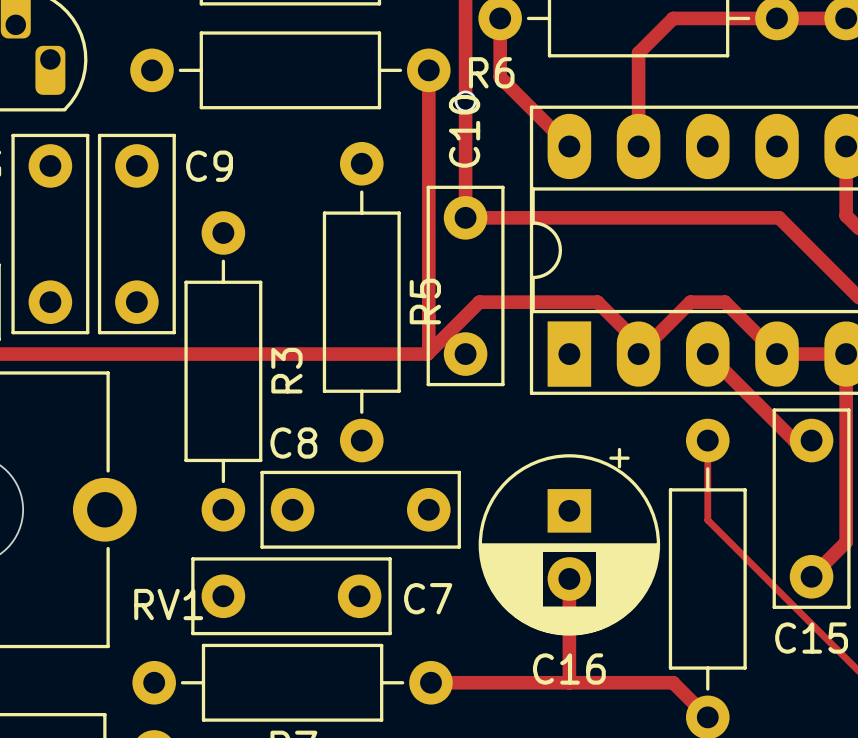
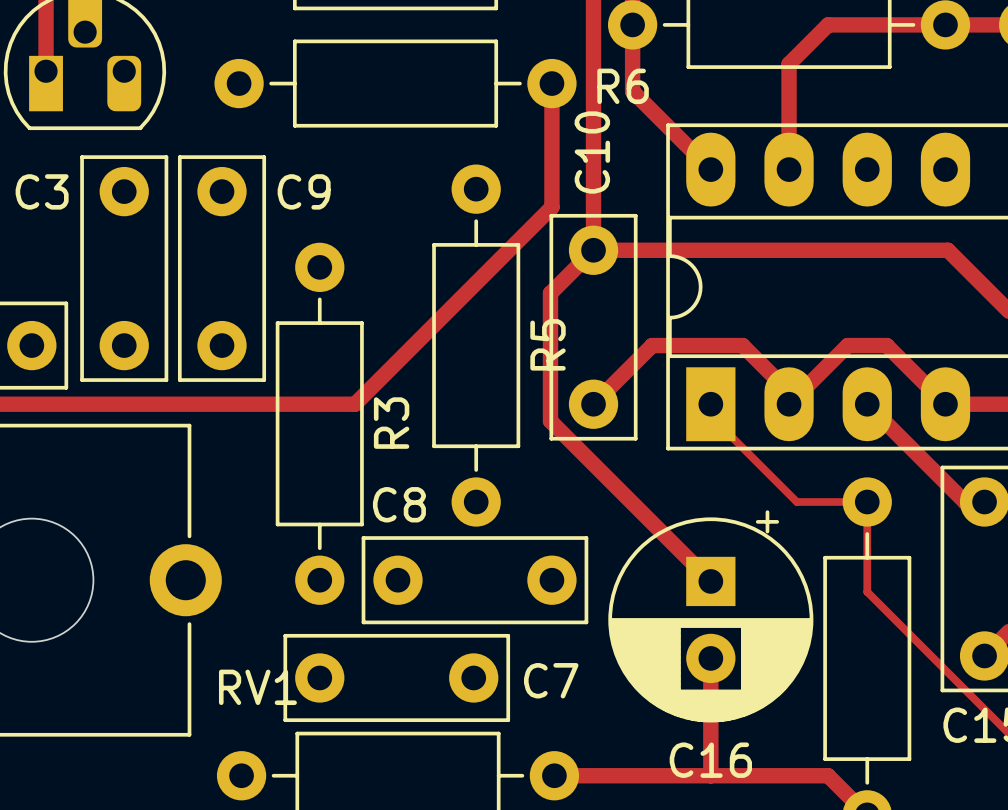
via: (465, 101) -> none
track: (428, 179) (428, 348) -> none
track: none -> (593, 250) (550, 293) (550, 421) (710, 581)
track: (517, 302) (479, 302) (427, 354) (254, 354) -> (551, 207) (354, 404)
track: none -> (652, 345) (593, 404)
track: none -> (710, 404) (710, 415) (796, 502) (867, 502)

